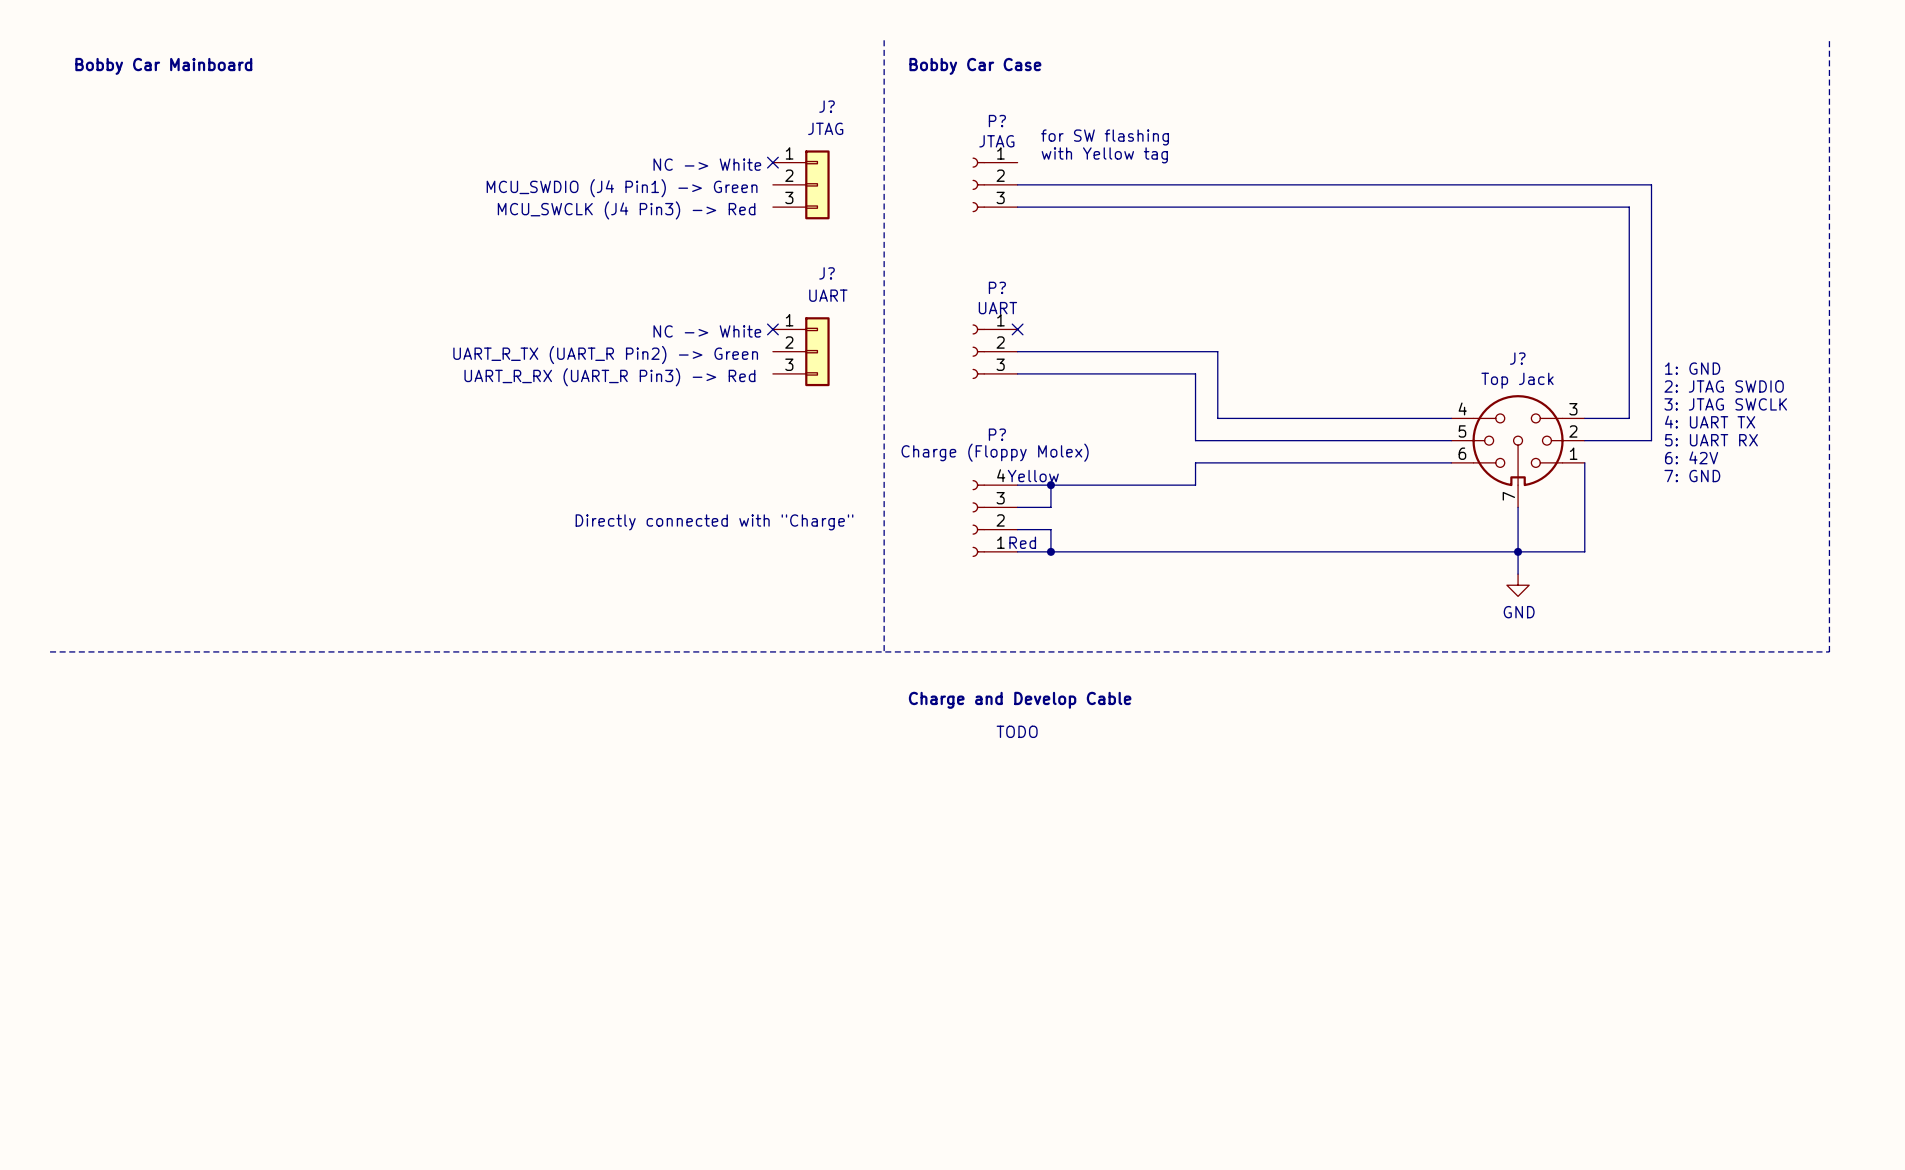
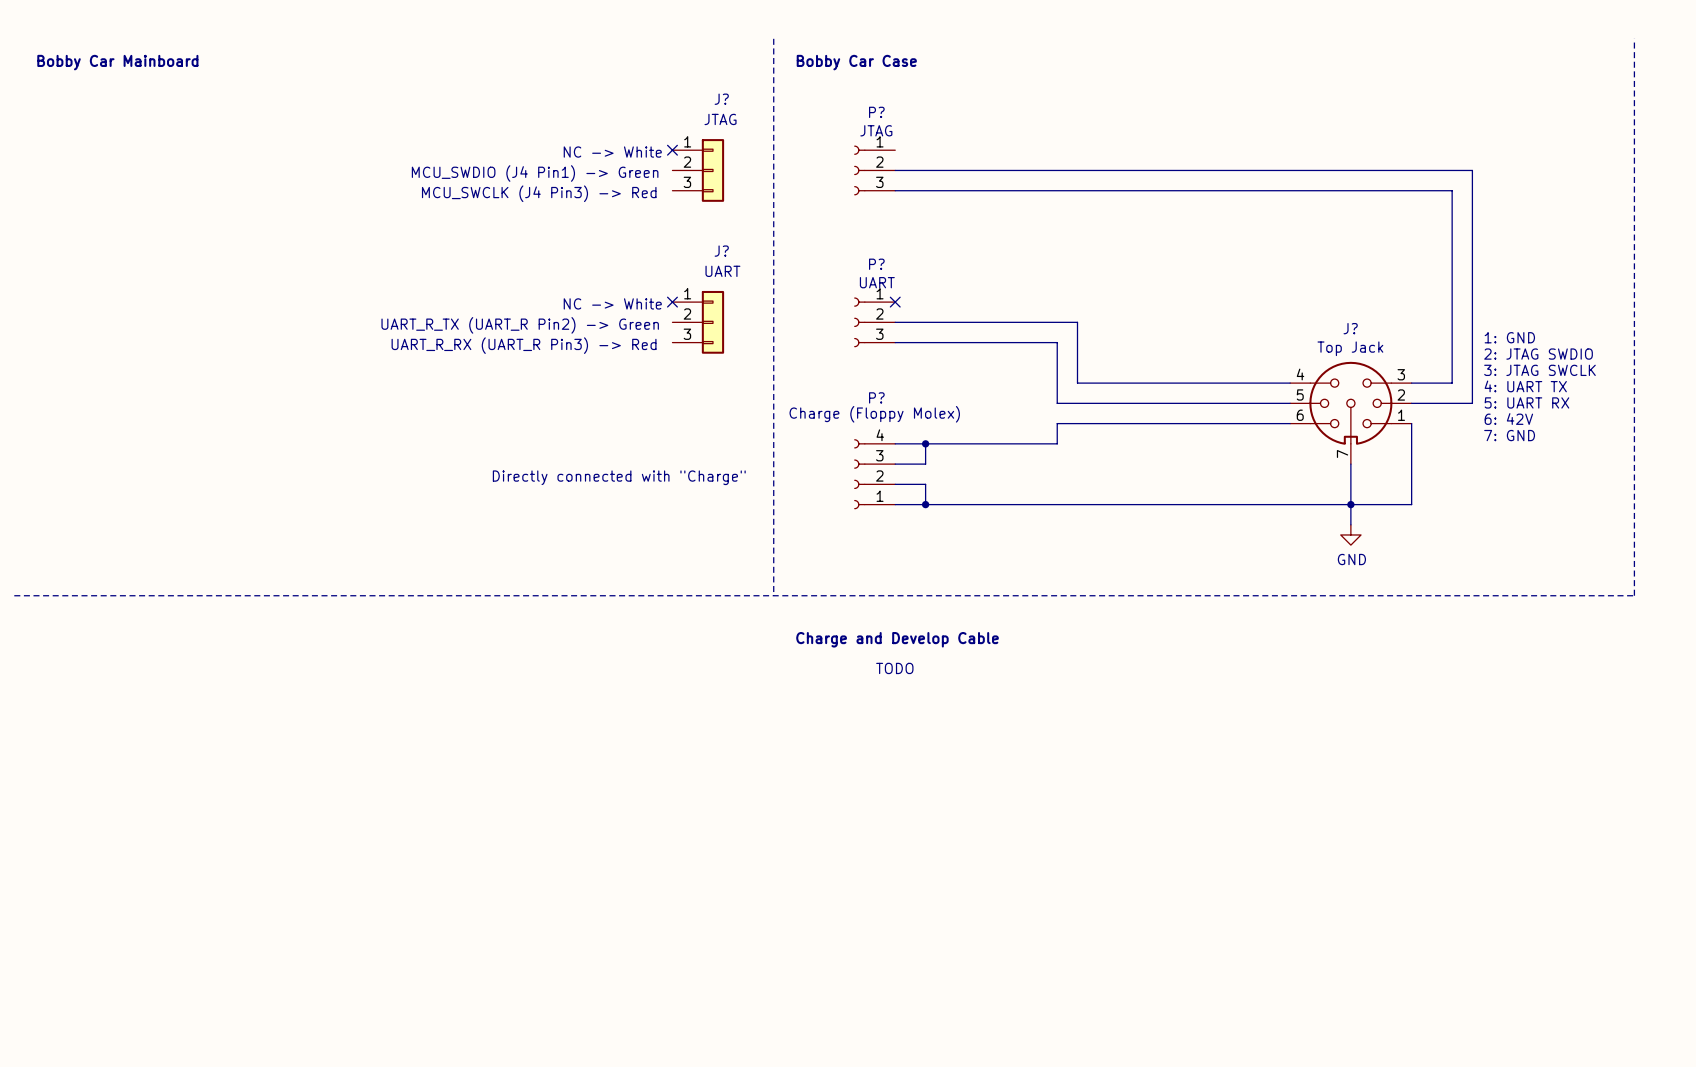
text: for SW flashing (1105, 137) -> none
text: with Yellow tag (1104, 155) -> none
text: Yellow (1033, 476) -> none
text: Red (1022, 542) -> none

